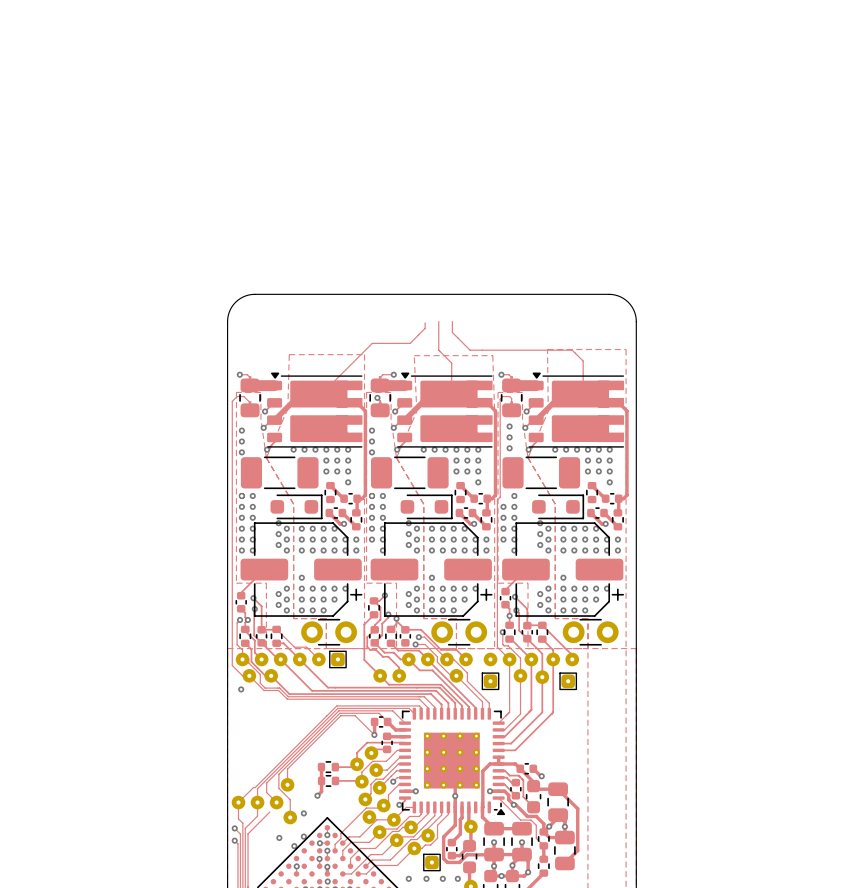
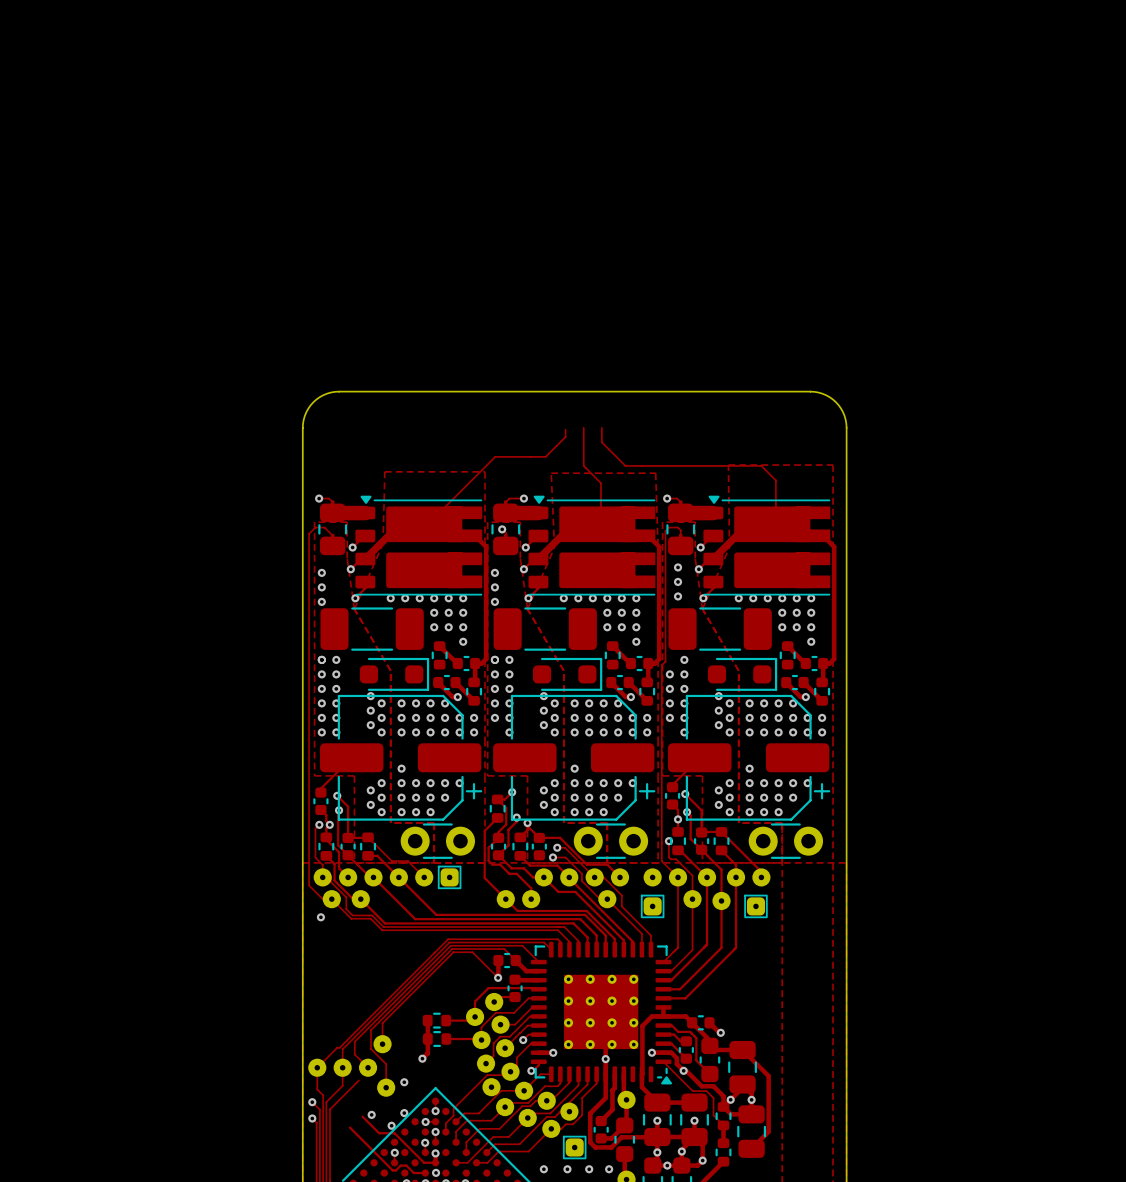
track: none -> (362, 1116) (379, 1133) (394, 1133) (424, 1162) (435, 1162)
track: none -> (349, 1127) (392, 1170) (395, 1170) (400, 1165) (406, 1165) (413, 1173) (425, 1173)

